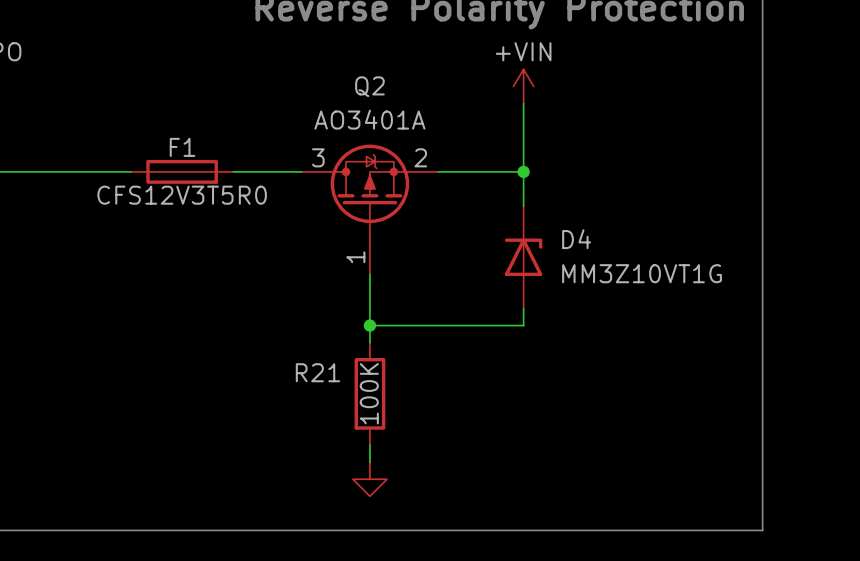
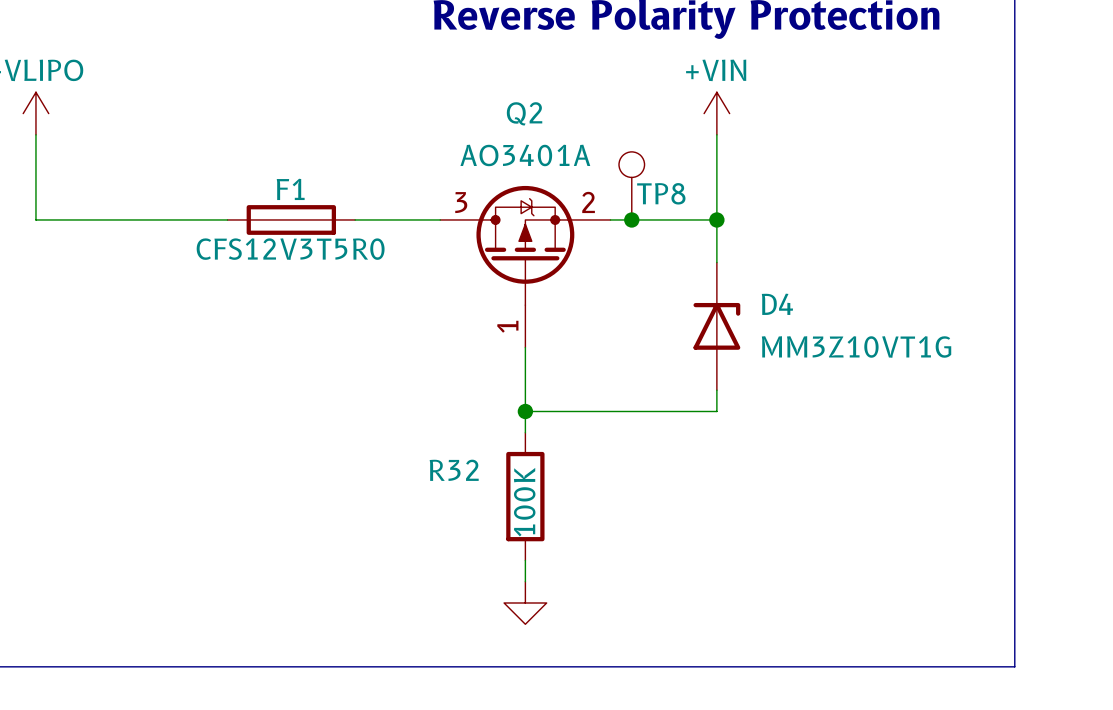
TP8: none -> (631, 185)
junction: none -> (631, 219)
R21 name: R21 (317, 372) -> R32 (454, 470)

